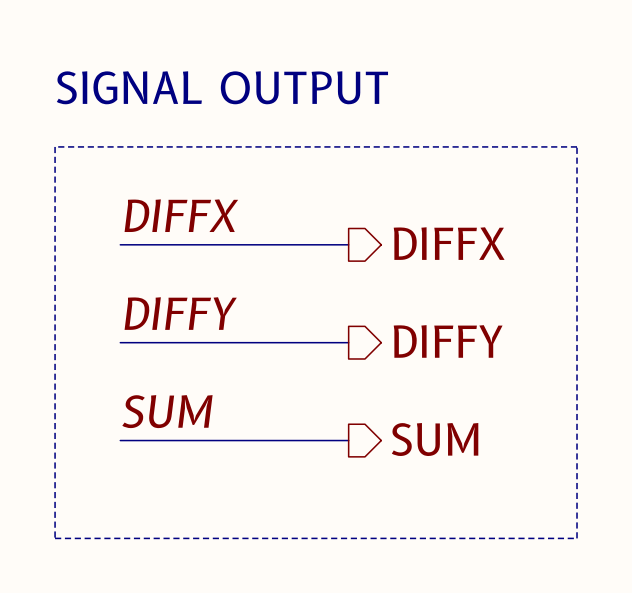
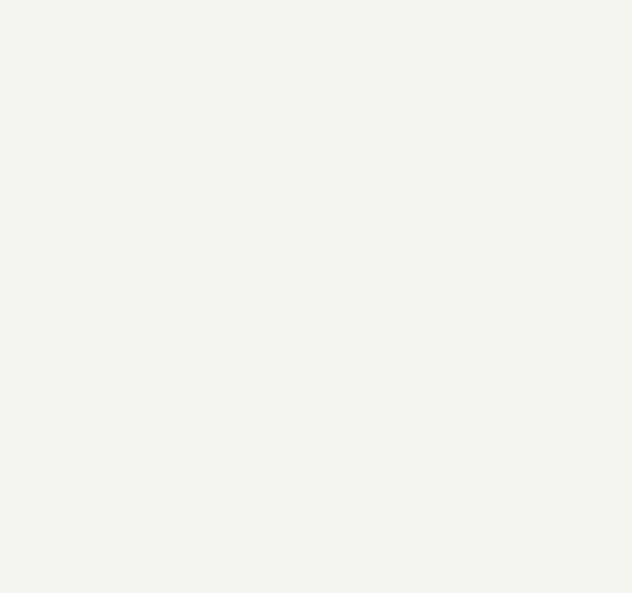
text: SIGNAL OUTPUT (222, 87) -> none
line: (55, 146) (55, 538) (577, 538) (577, 146) (55, 146) -> none
label: DIFFX (181, 215) -> none
hierarchical label: DIFFX (449, 243) -> none
wire: (120, 244) (348, 244) -> none
label: DIFFY (180, 313) -> none
hierarchical label: DIFFY (448, 341) -> none
wire: (120, 342) (348, 342) -> none
label: SUM (167, 411) -> none
hierarchical label: SUM (435, 439) -> none
wire: (120, 440) (348, 440) -> none

